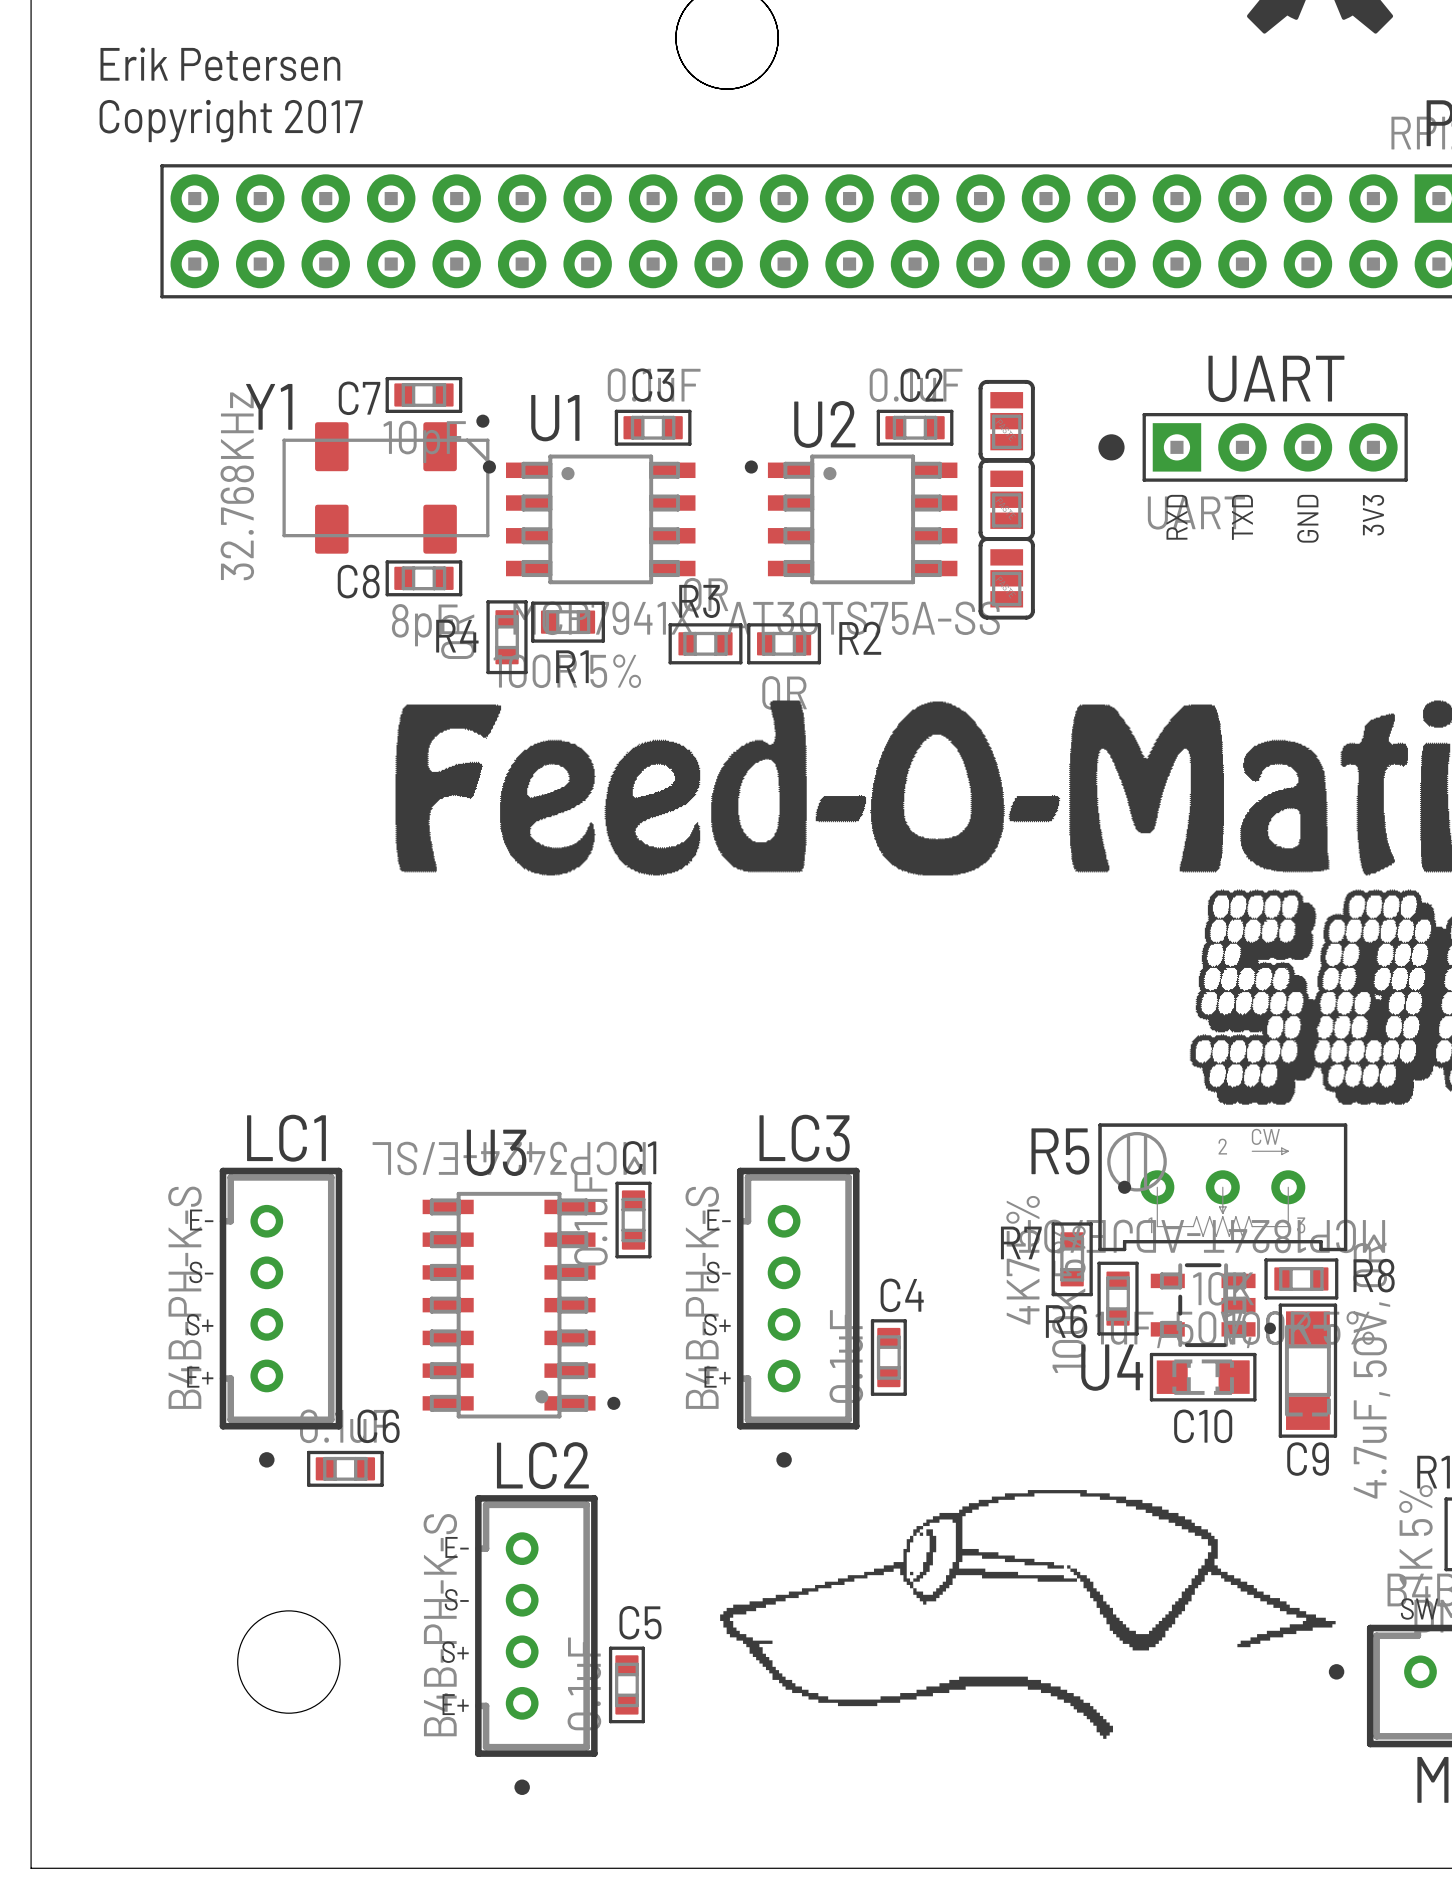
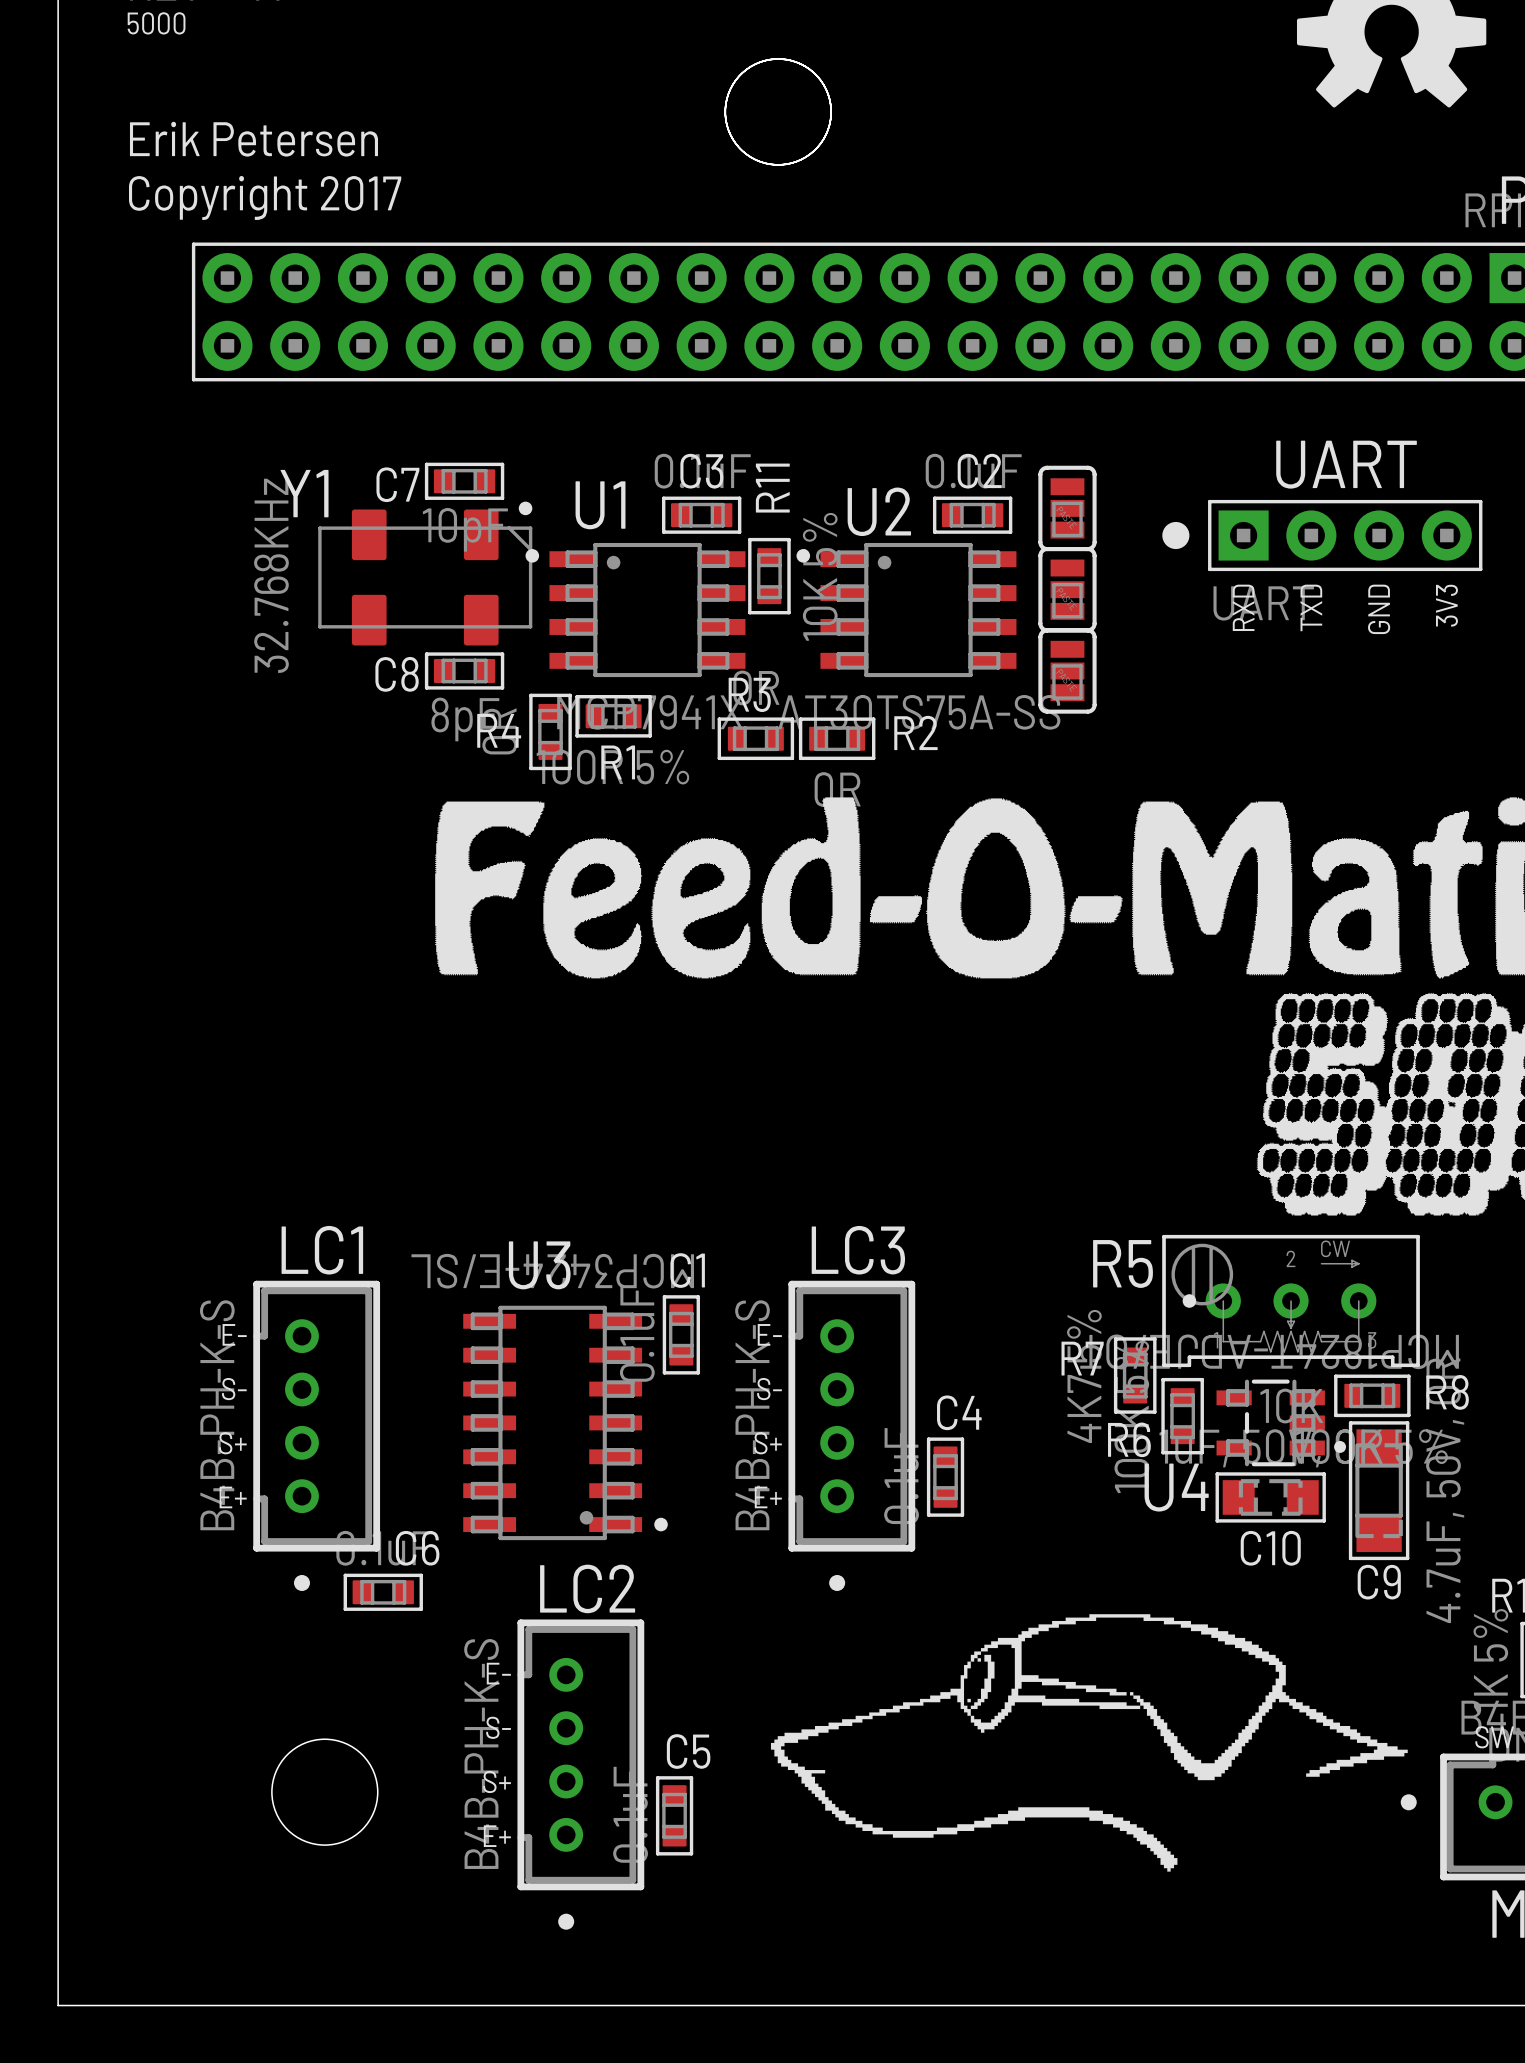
R11: none -> 10K 5% (769, 576)

